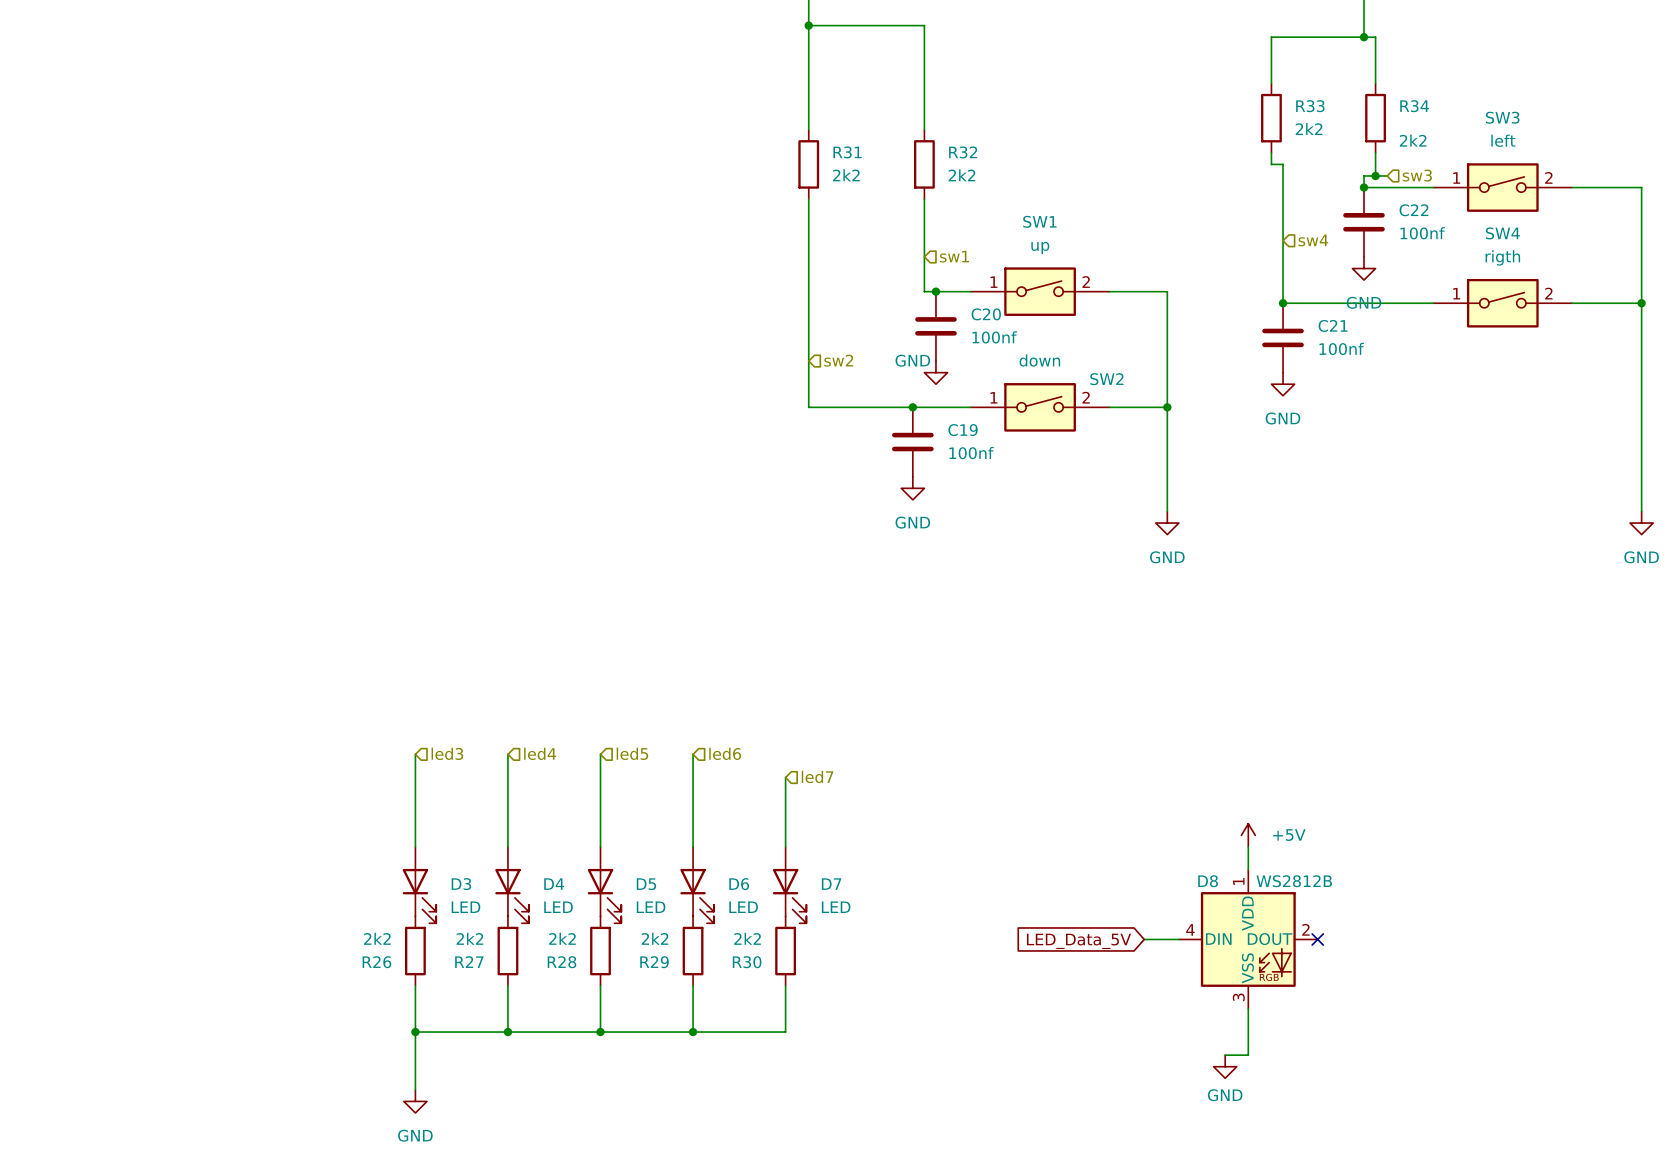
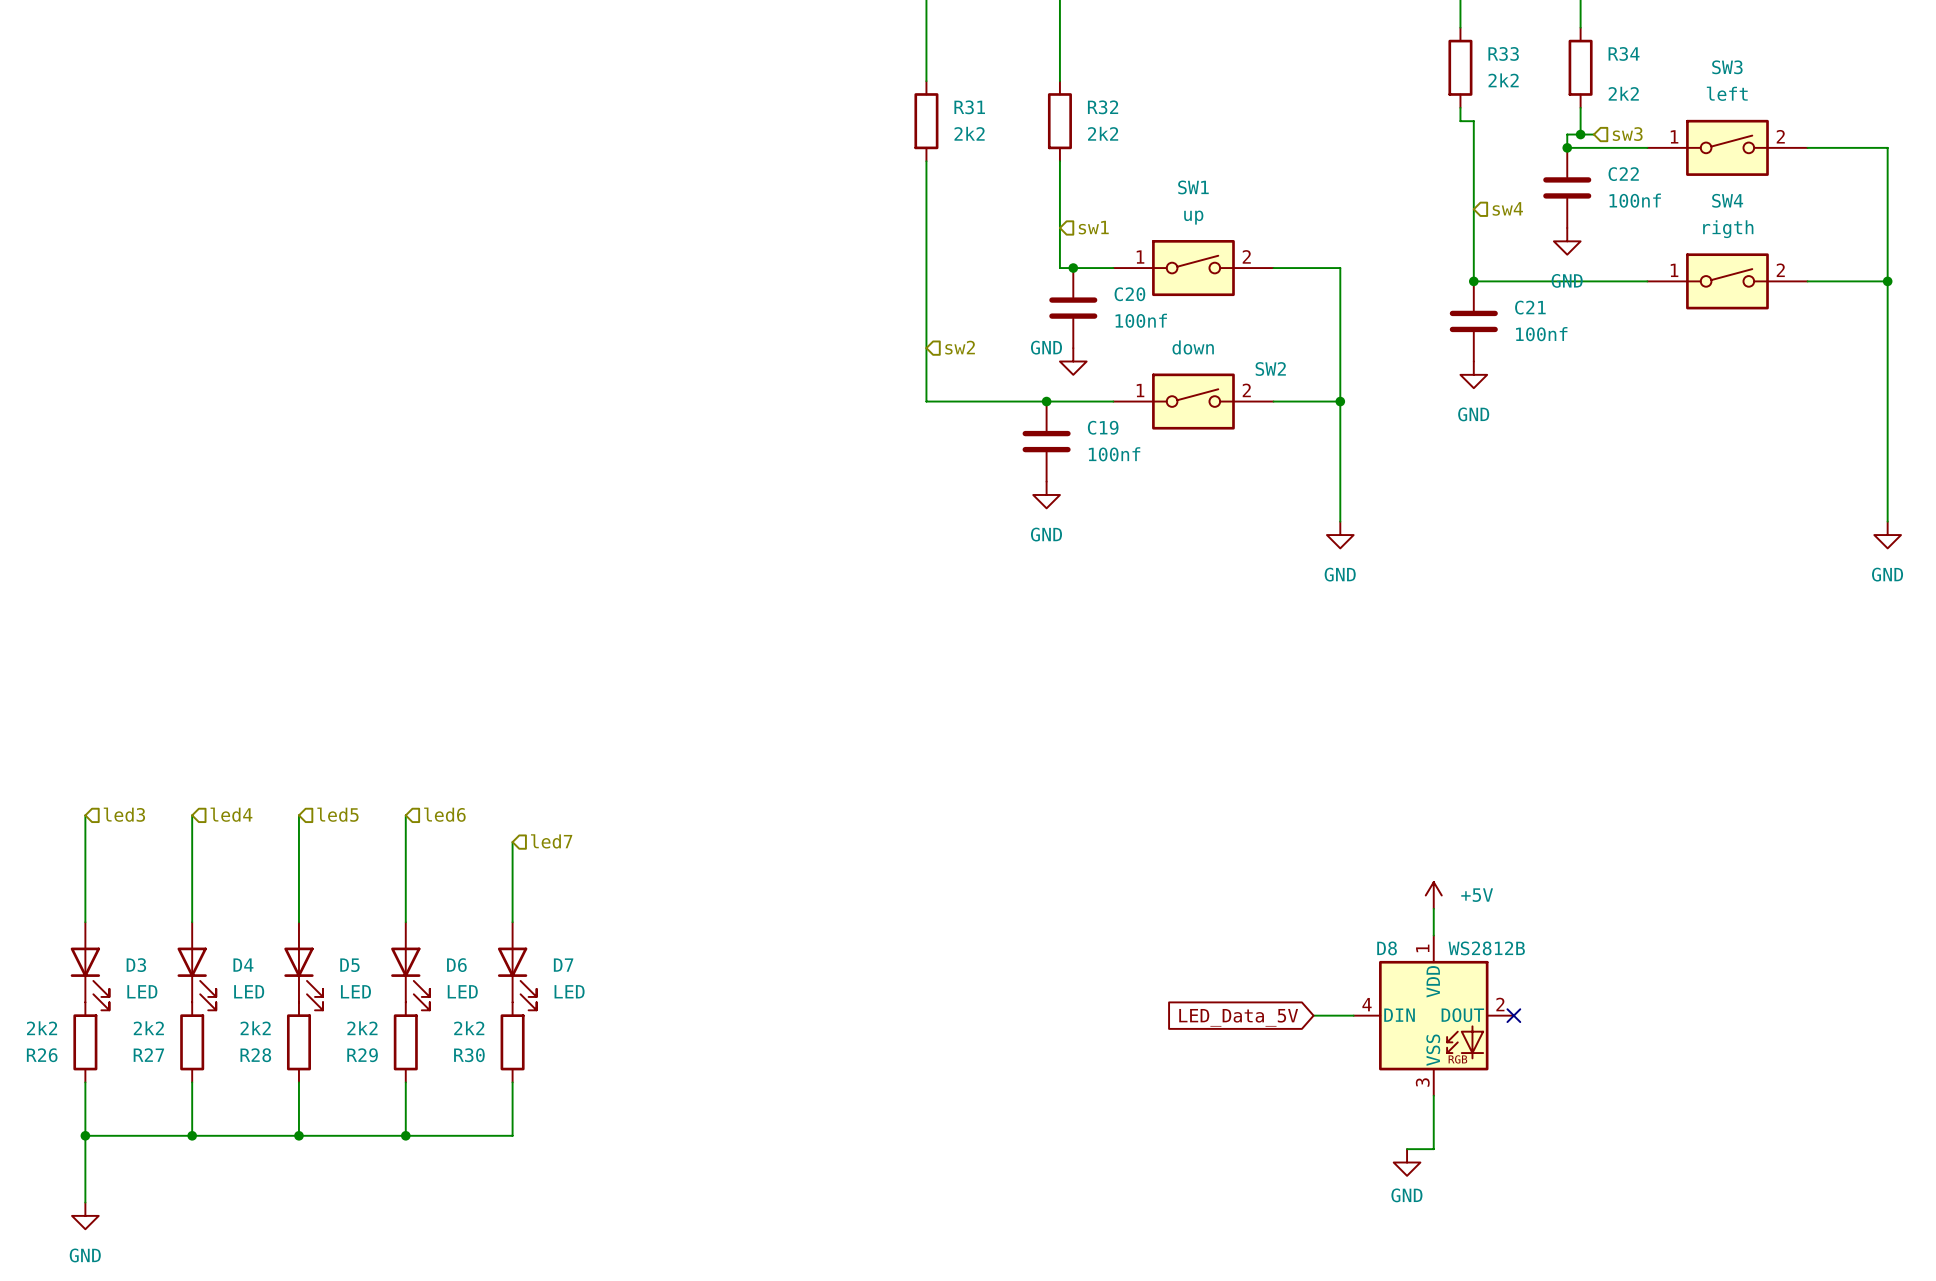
hierarchical label: led3 (447, 753) -> none
hierarchical label: led4 (540, 753) -> none
hierarchical label: led5 (632, 753) -> none
hierarchical label: led6 (725, 753) -> none
wire: (415, 754) (415, 846) -> (298, 815) (298, 922)
wire: (507, 754) (507, 846) -> (405, 815) (405, 922)
wire: (600, 754) (600, 846) -> none
wire: (693, 754) (693, 846) -> none
wire: none -> (85, 815) (85, 922)
hierarchical label: none -> led3 (124, 814)
wire: none -> (192, 815) (192, 922)
hierarchical label: none -> led4 (231, 814)
hierarchical label: none -> led5 (337, 814)
hierarchical label: none -> led6 (444, 814)
hierarchical label: led7 (817, 776) -> none
wire: (785, 777) (785, 846) -> none
hierarchical label: none -> led7 (551, 841)
wire: none -> (512, 842) (512, 922)
D3 position: (419, 885) -> (90, 966)
D4 position: (512, 885) -> (196, 966)
D5 position: (604, 885) -> (303, 966)
D6 position: (697, 885) -> (410, 966)
D7 position: (789, 885) -> (517, 966)
R26 position: (415, 951) -> (85, 1042)
R27 position: (507, 951) -> (192, 1042)
R28 position: (600, 951) -> (298, 1042)
R29 position: (693, 951) -> (405, 1042)
R30 position: (785, 951) -> (512, 1042)
wire: (415, 985) (415, 1089) -> none
wire: (507, 985) (507, 1032) -> (405, 1082) (405, 1135)
wire: (600, 985) (600, 1032) -> none
wire: (693, 985) (693, 1032) -> none
wire: (785, 985) (785, 1032) (415, 1032) -> none
wire: none -> (85, 1082) (85, 1202)
wire: none -> (192, 1082) (192, 1135)
wire: none -> (298, 1082) (298, 1135)
wire: none -> (512, 1082) (512, 1135) (85, 1135)
junction: (415, 1032) -> none
junction: (507, 1032) -> none
junction: (600, 1032) -> none
junction: (693, 1032) -> none
junction: none -> (85, 1135)
junction: none -> (192, 1135)
junction: none -> (298, 1135)
junction: none -> (405, 1135)
power symbol: GND (415, 1101) -> none
power symbol: none -> GND (85, 1215)

